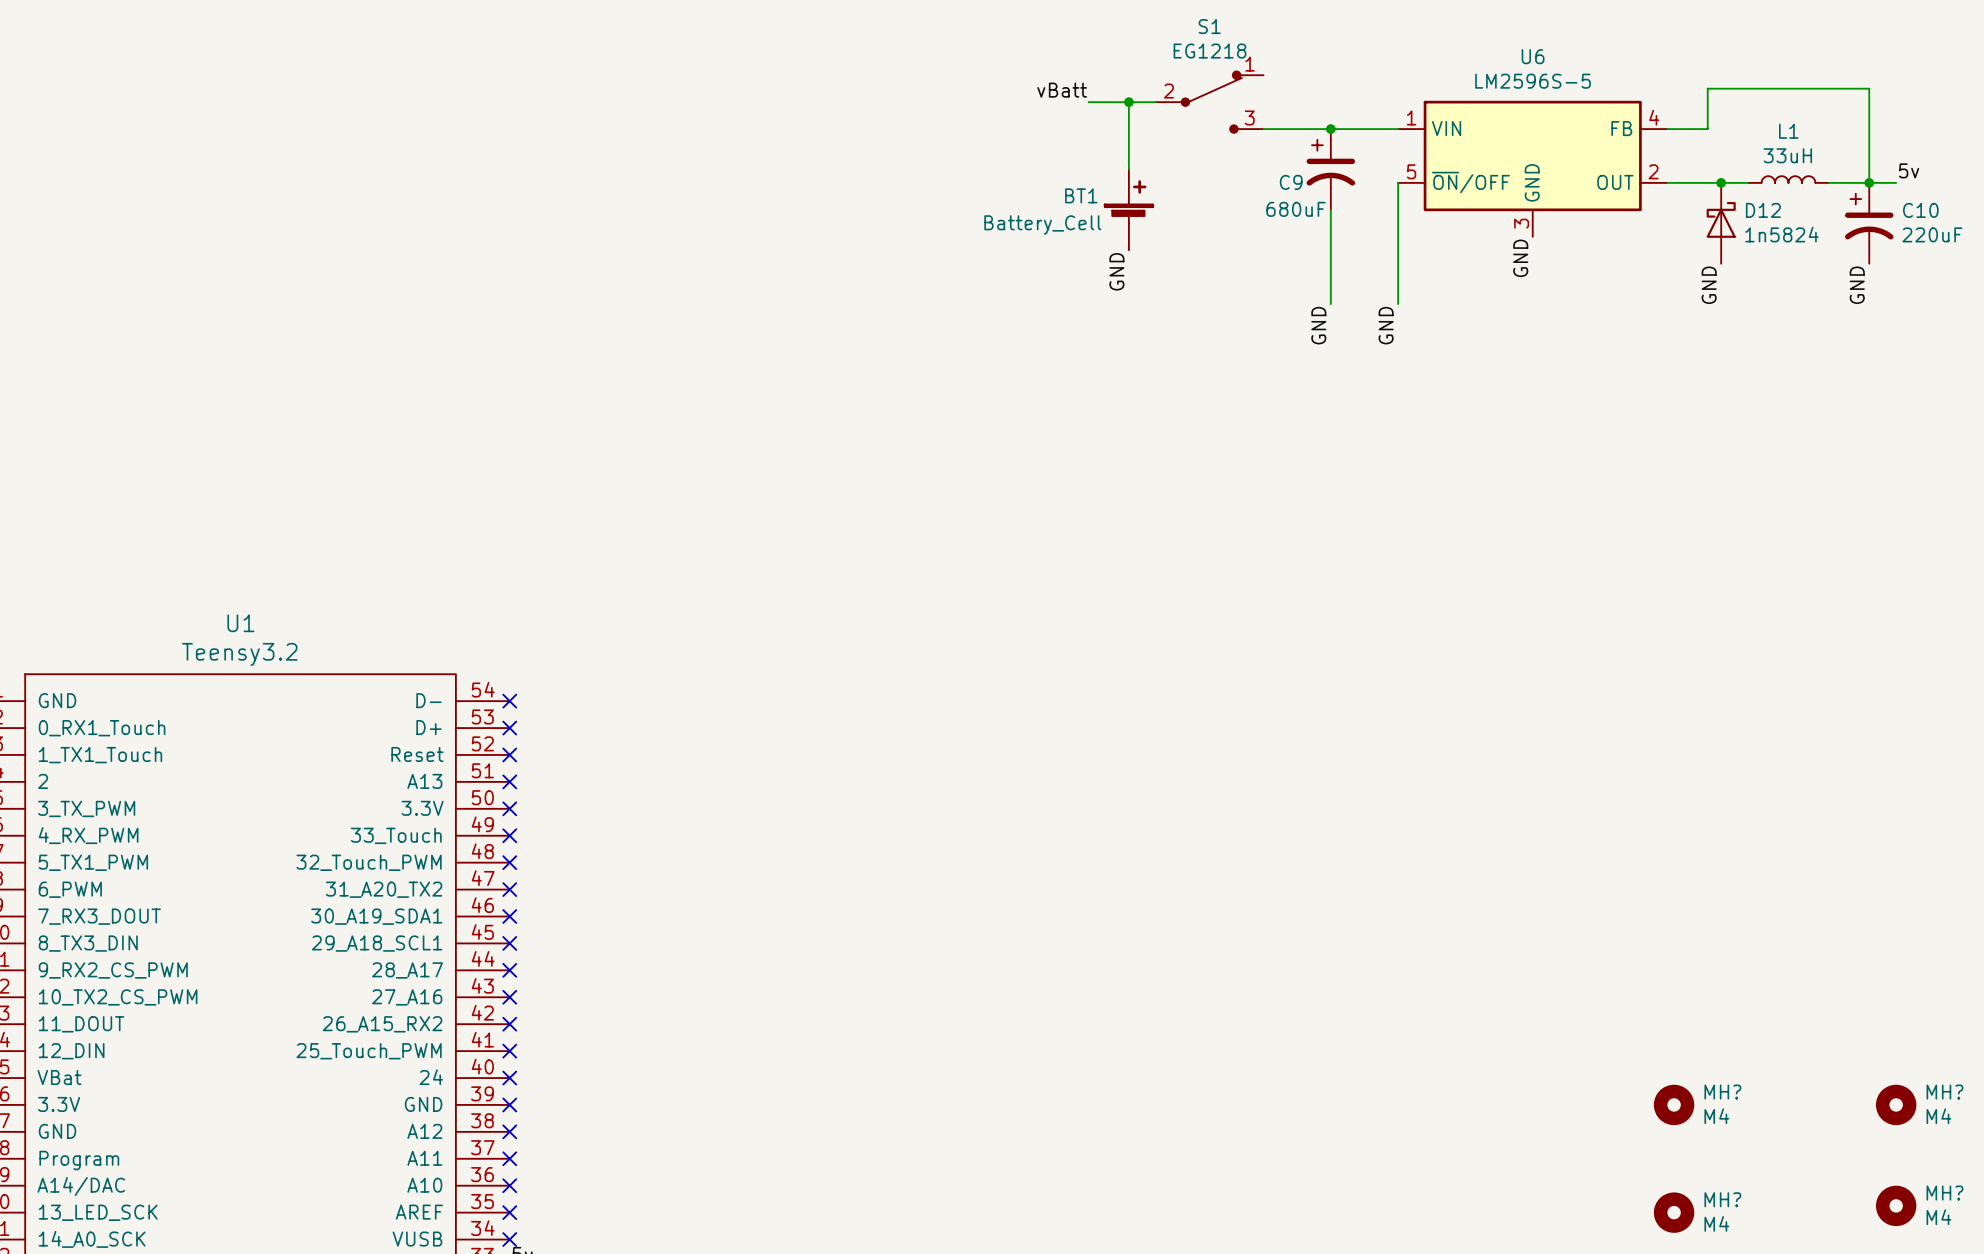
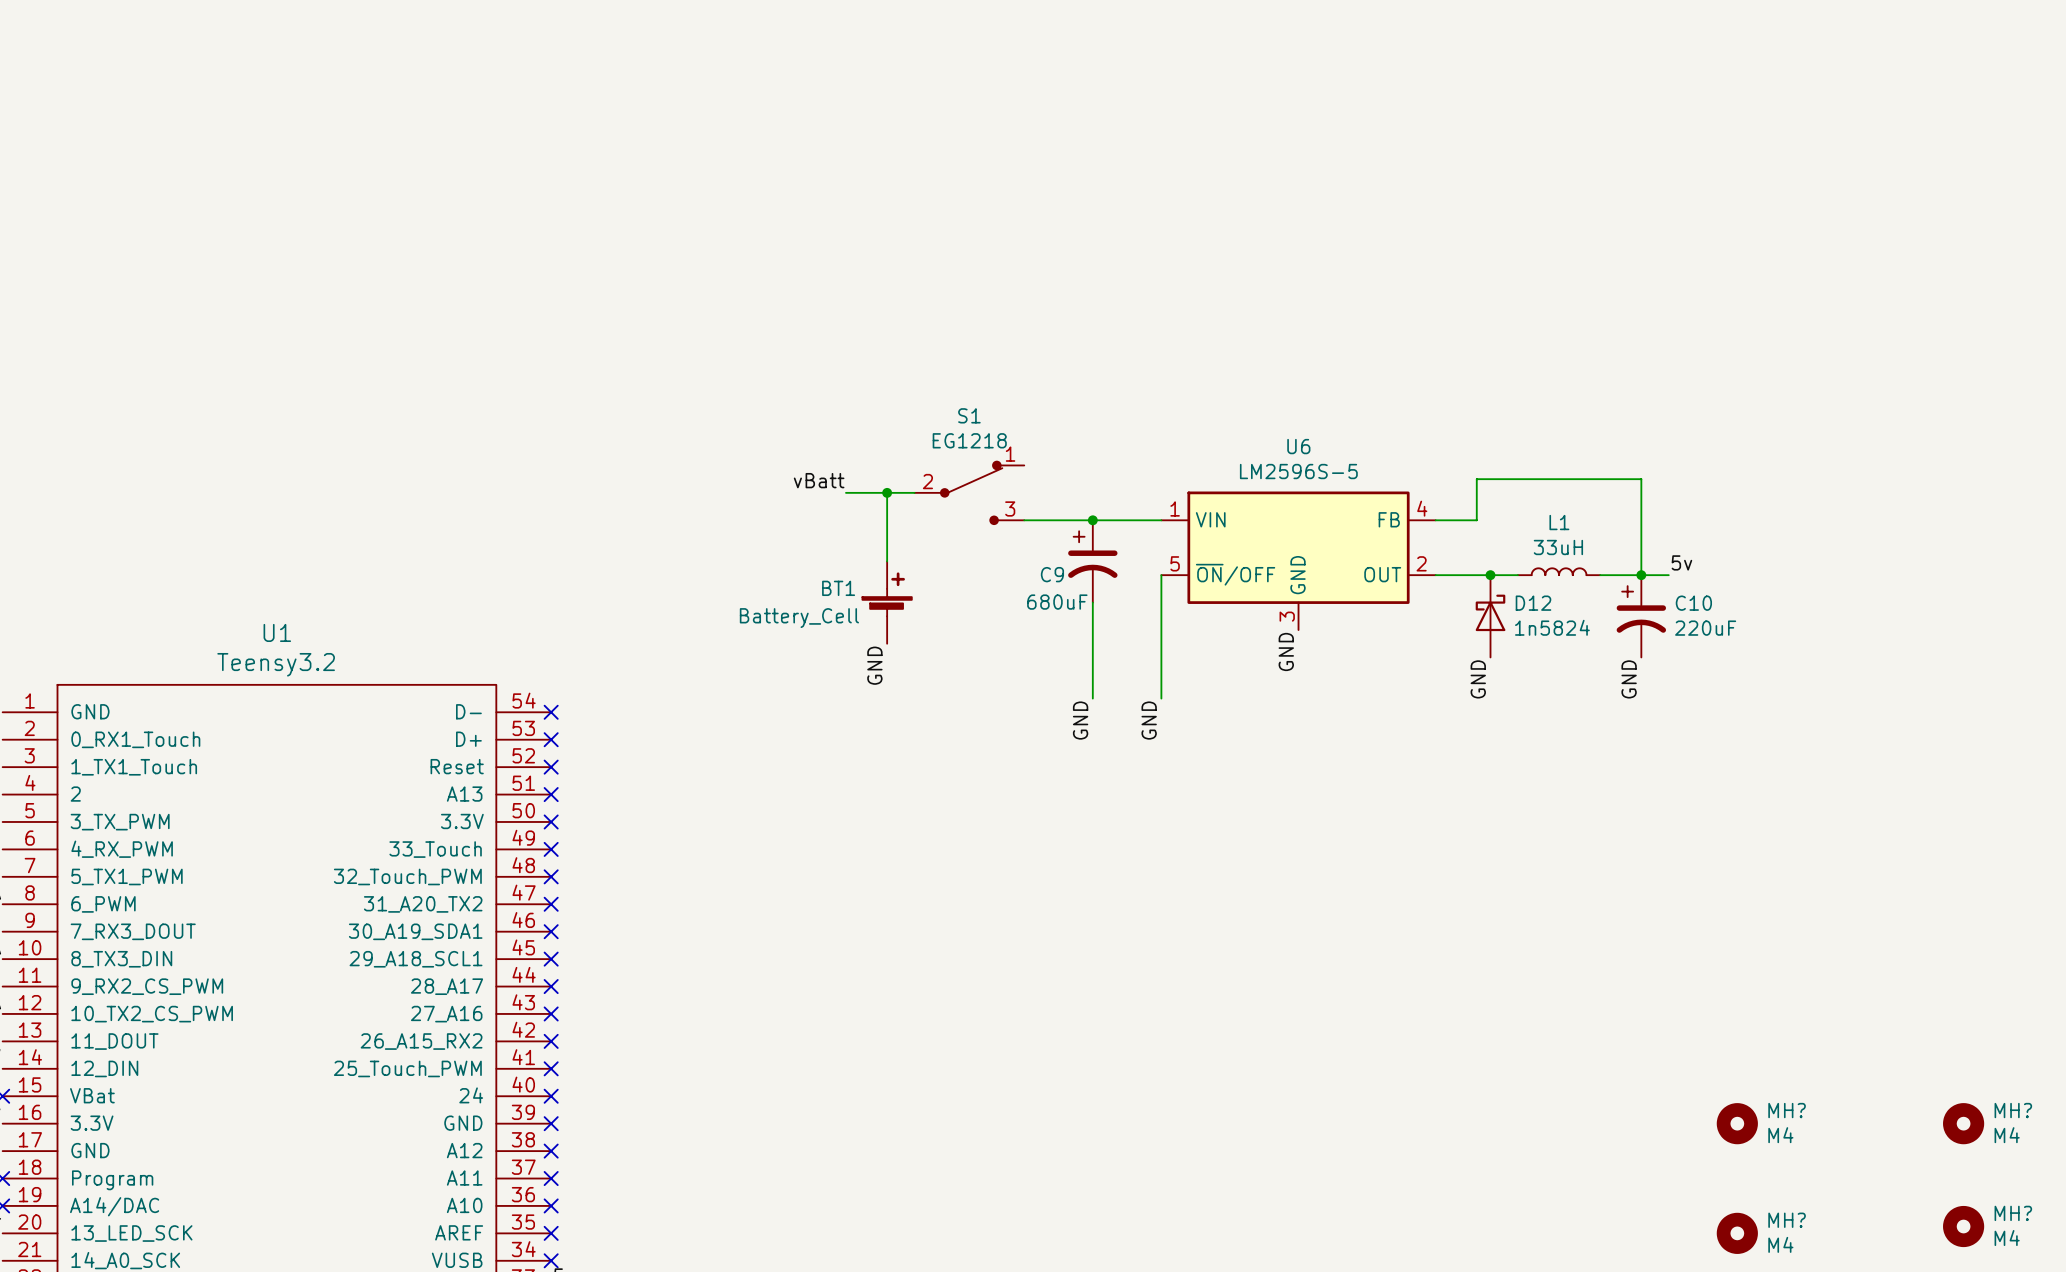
label: vBatt (1062, 90) -> none
wire: (1088, 102) (1155, 102) -> none
wire: (1128, 102) (1128, 169) -> none
junction: (1128, 102) -> none
S1 position: (1209, 102) -> (969, 492)
wire: (1263, 129) (1398, 129) -> none
junction: (1330, 129) -> none
wire: (1667, 129) (1707, 129) (1707, 88) (1869, 88) (1869, 182) -> none
U6 position: (1532, 168) -> (1298, 560)
C9 position: (1330, 169) -> (1092, 561)
label: 5v (1909, 170) -> none
L1 position: (1788, 179) -> (1559, 571)
wire: (1398, 182) (1398, 304) -> none
wire: (1667, 182) (1748, 182) -> none
junction: (1721, 182) -> none
wire: (1828, 182) (1896, 182) -> none
junction: (1869, 182) -> none
BT1 position: (1128, 209) -> (887, 602)
wire: (1330, 209) (1330, 304) -> none
D12 position: (1721, 223) -> (1490, 616)
C10 position: (1869, 223) -> (1641, 616)
label: GND (1520, 258) -> none
label: GND (1116, 271) -> none
label: GND (1709, 285) -> none
label: GND (1857, 285) -> none
label: GND (1318, 325) -> none
label: GND (1386, 325) -> none
label: none -> vBatt (819, 480)
wire: none -> (845, 492) (914, 492)
wire: none -> (887, 492) (887, 561)
junction: none -> (887, 492)
wire: none -> (1024, 520) (1161, 520)
junction: none -> (1092, 520)
wire: none -> (1435, 520) (1476, 520) (1476, 479) (1641, 479) (1641, 575)
label: none -> 5v (1681, 562)
wire: none -> (1161, 575) (1161, 698)
wire: none -> (1435, 575) (1517, 575)
junction: none -> (1490, 575)
wire: none -> (1600, 575) (1668, 575)
junction: none -> (1641, 575)
wire: none -> (1092, 602) (1092, 698)
label: none -> GND (1286, 651)
label: none -> GND (874, 665)
label: none -> GND (1478, 679)
label: none -> GND (1629, 679)
label: none -> GND (1080, 720)
label: none -> GND (1149, 720)

